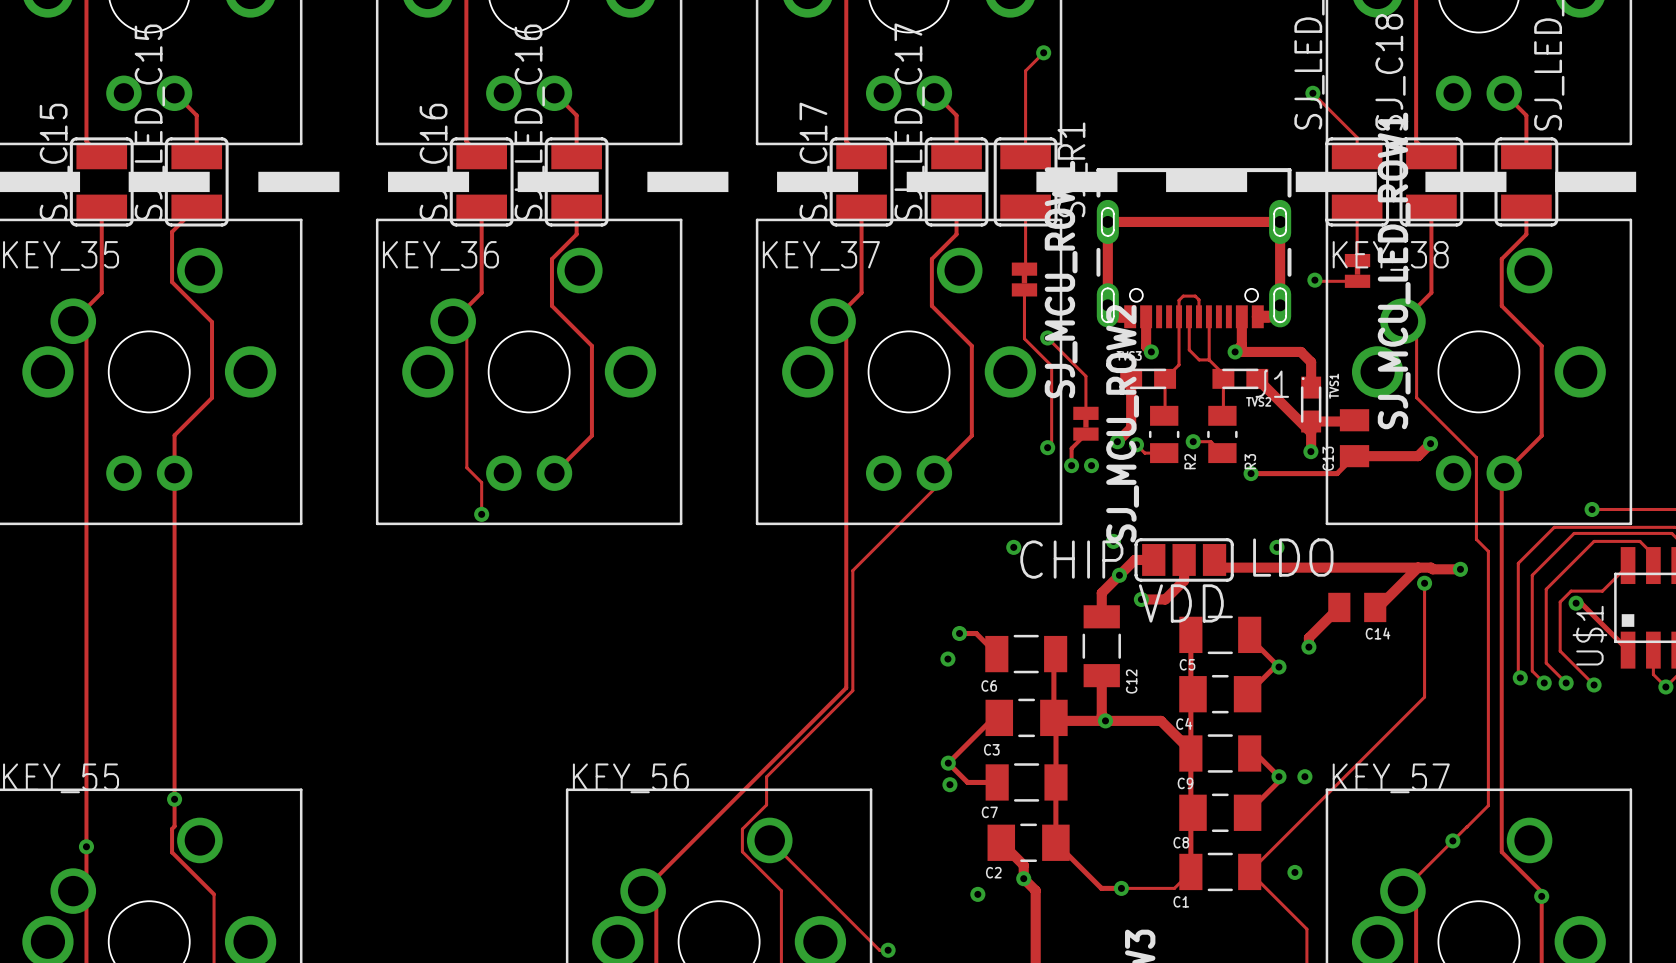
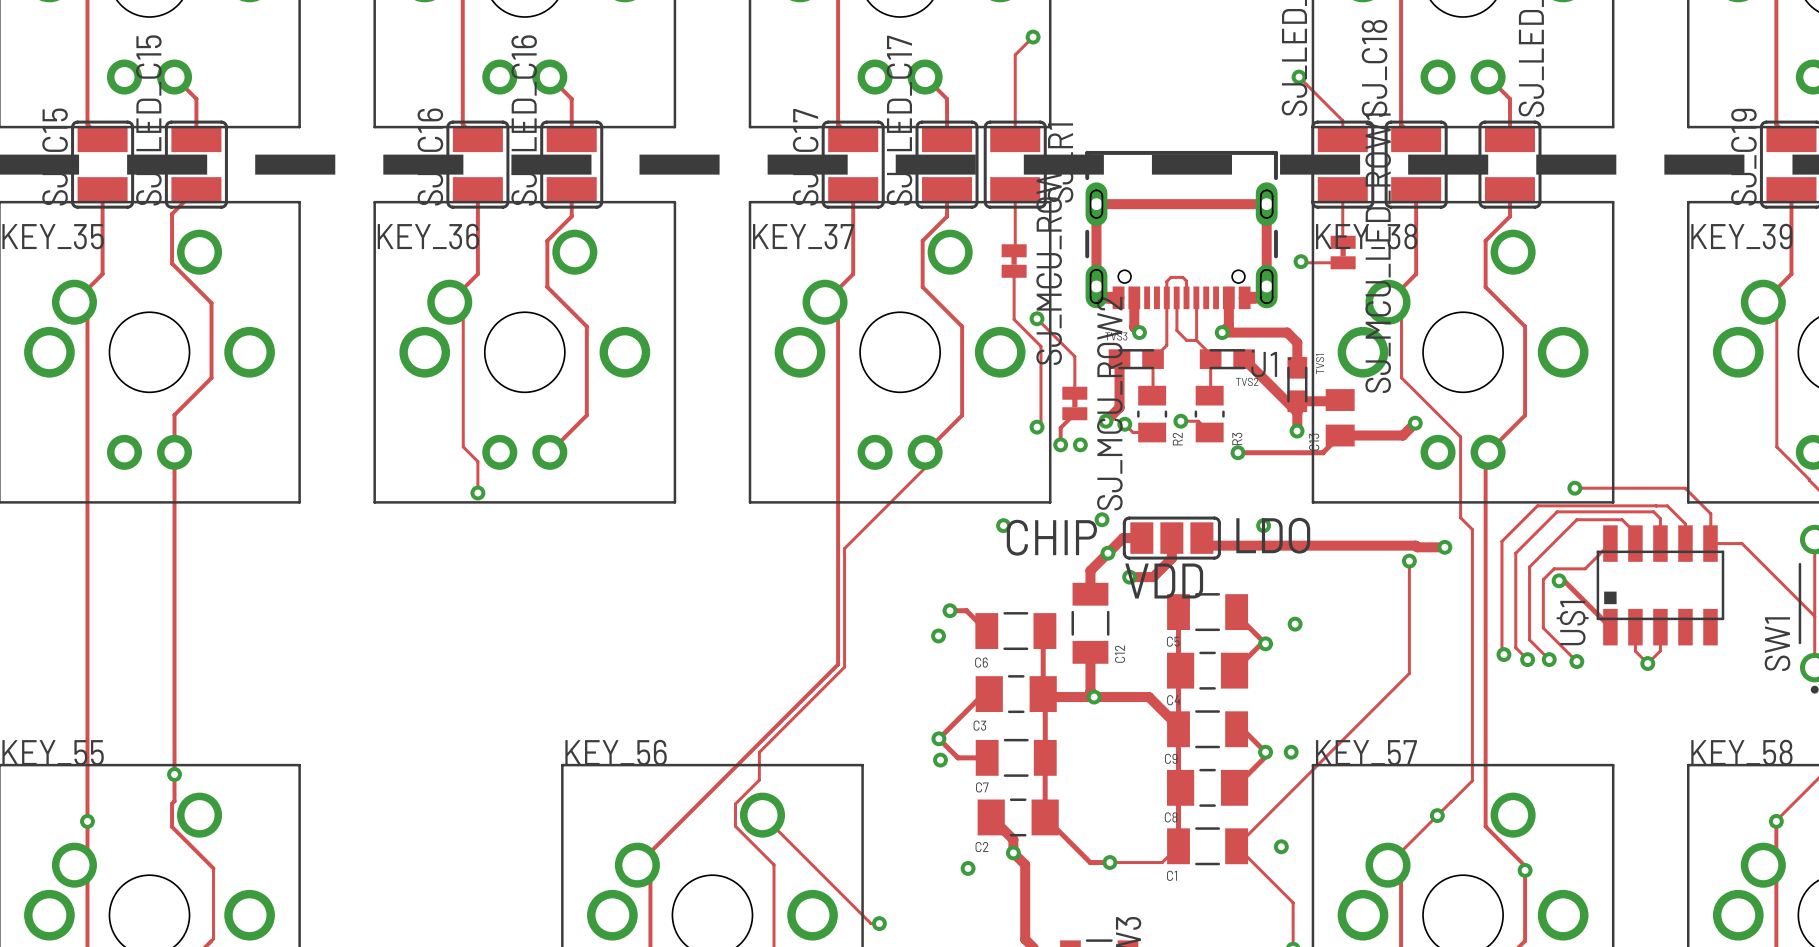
track: (1418, 567) (1378, 607) (1375, 607) -> none
track: (1339, 607) (1308, 637) (1308, 647) -> none
C14: (1357, 607) -> none

